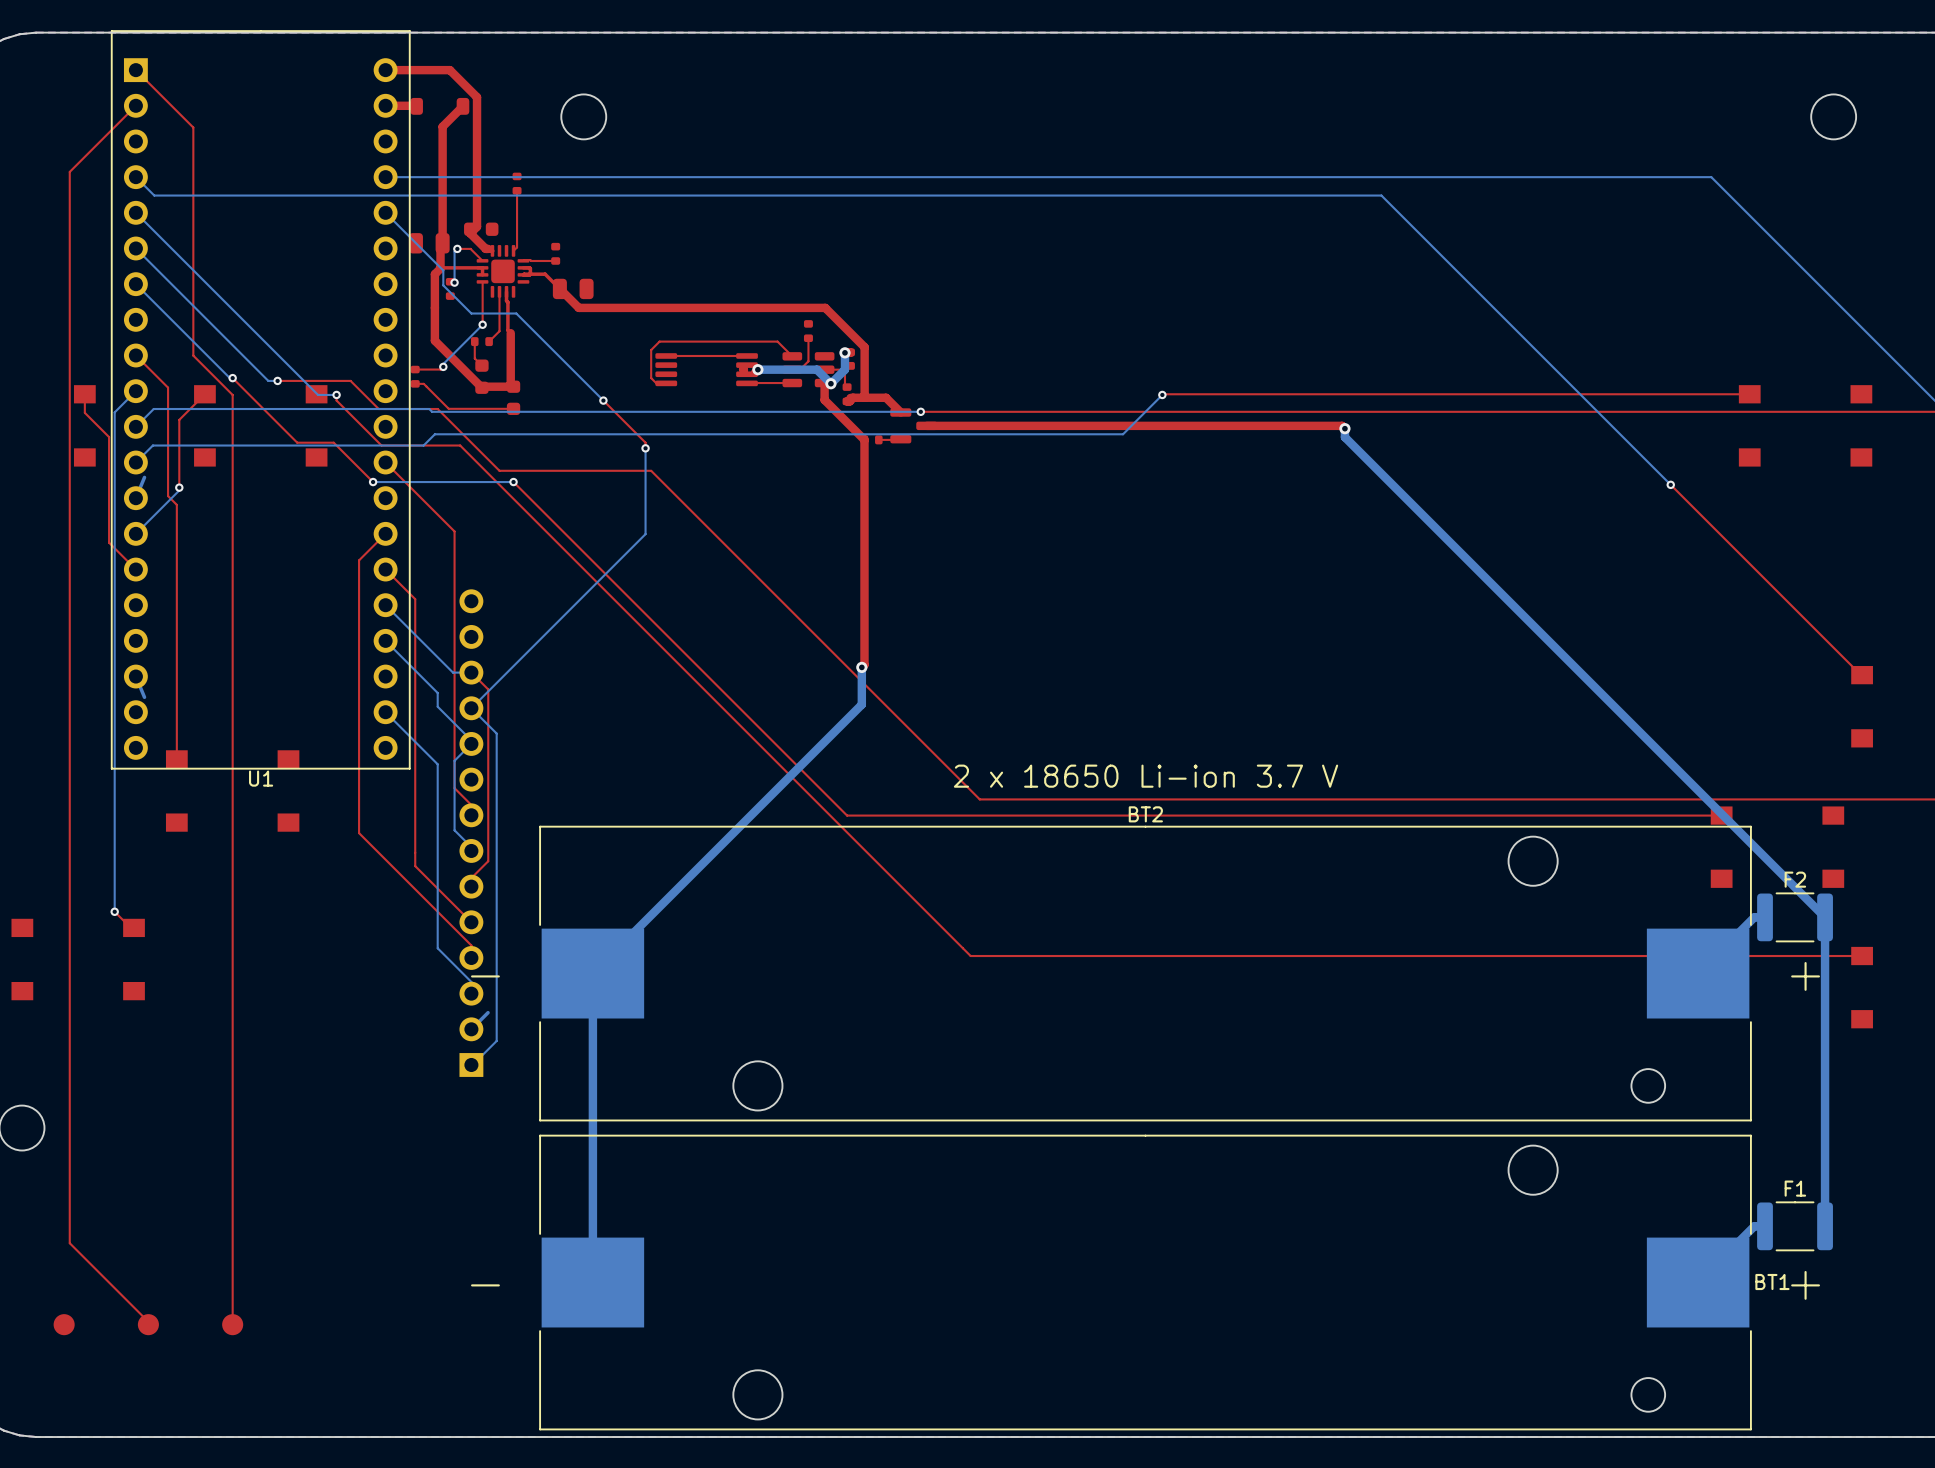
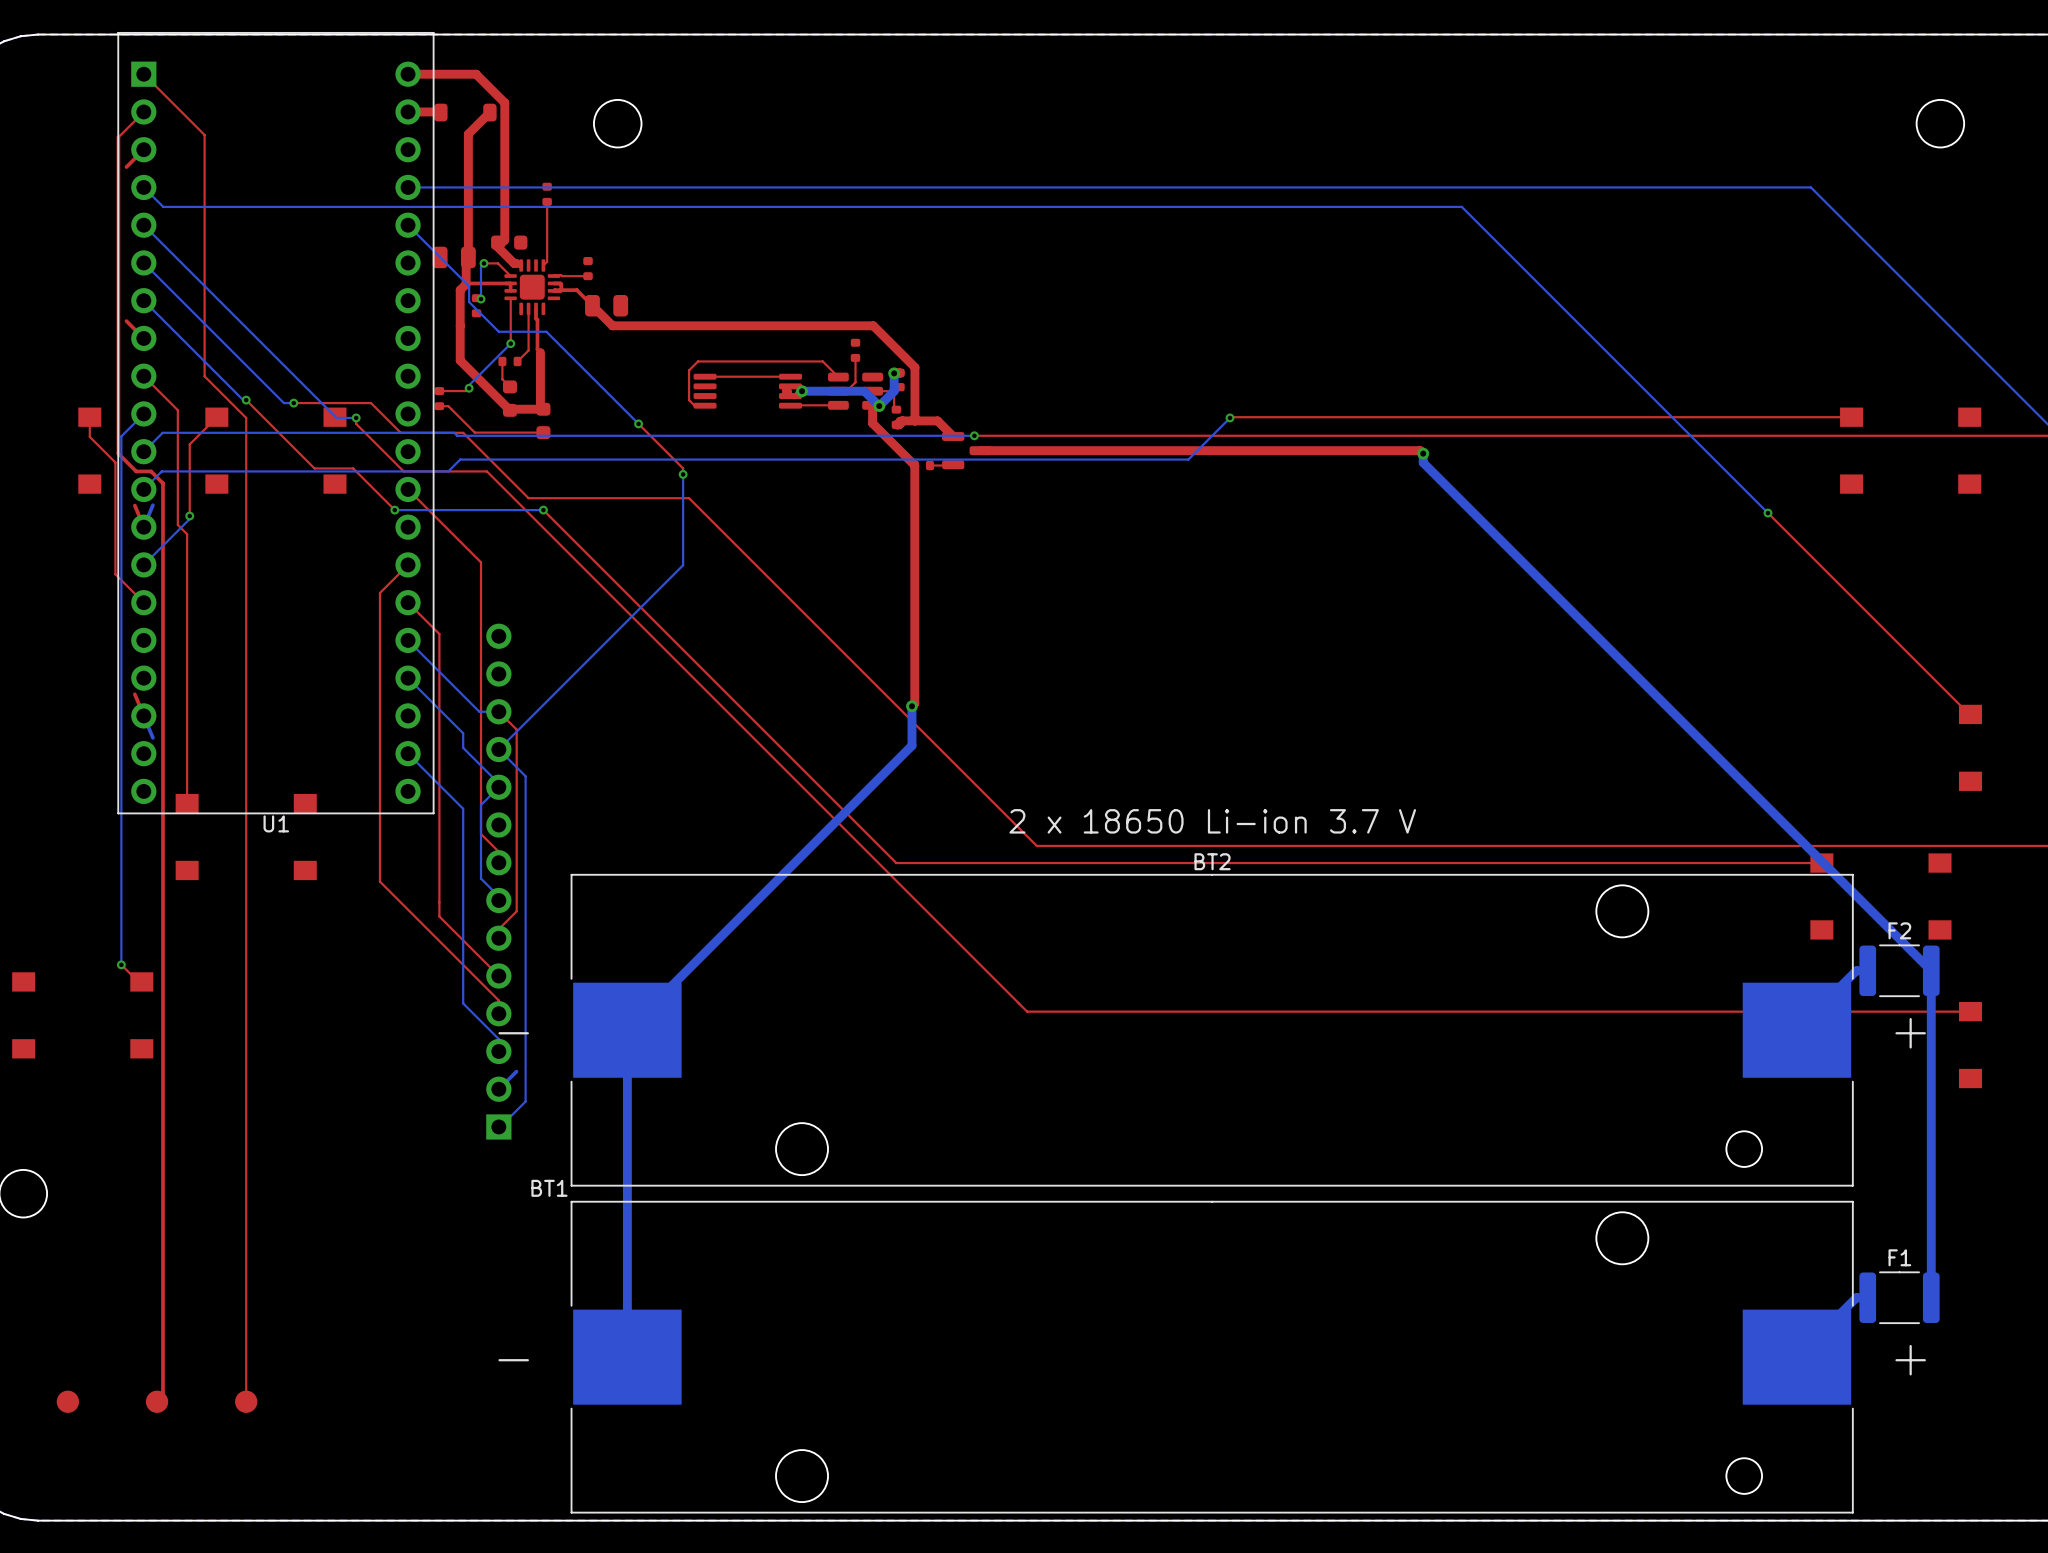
top track: (111, 129) (69, 171) (69, 1243) (148, 1321) (148, 1324) -> (118, 137) (118, 453) (136, 471) (151, 471) (162, 483) (162, 1395) (157, 1401)
top track: none -> (143, 149) (126, 167)
top track: none -> (126, 321) (143, 338)
top track: none -> (134, 505) (143, 527)
top track: none -> (134, 694) (143, 715)
BT1 name position: BT1 (1772, 1282) -> BT1 (549, 1188)

